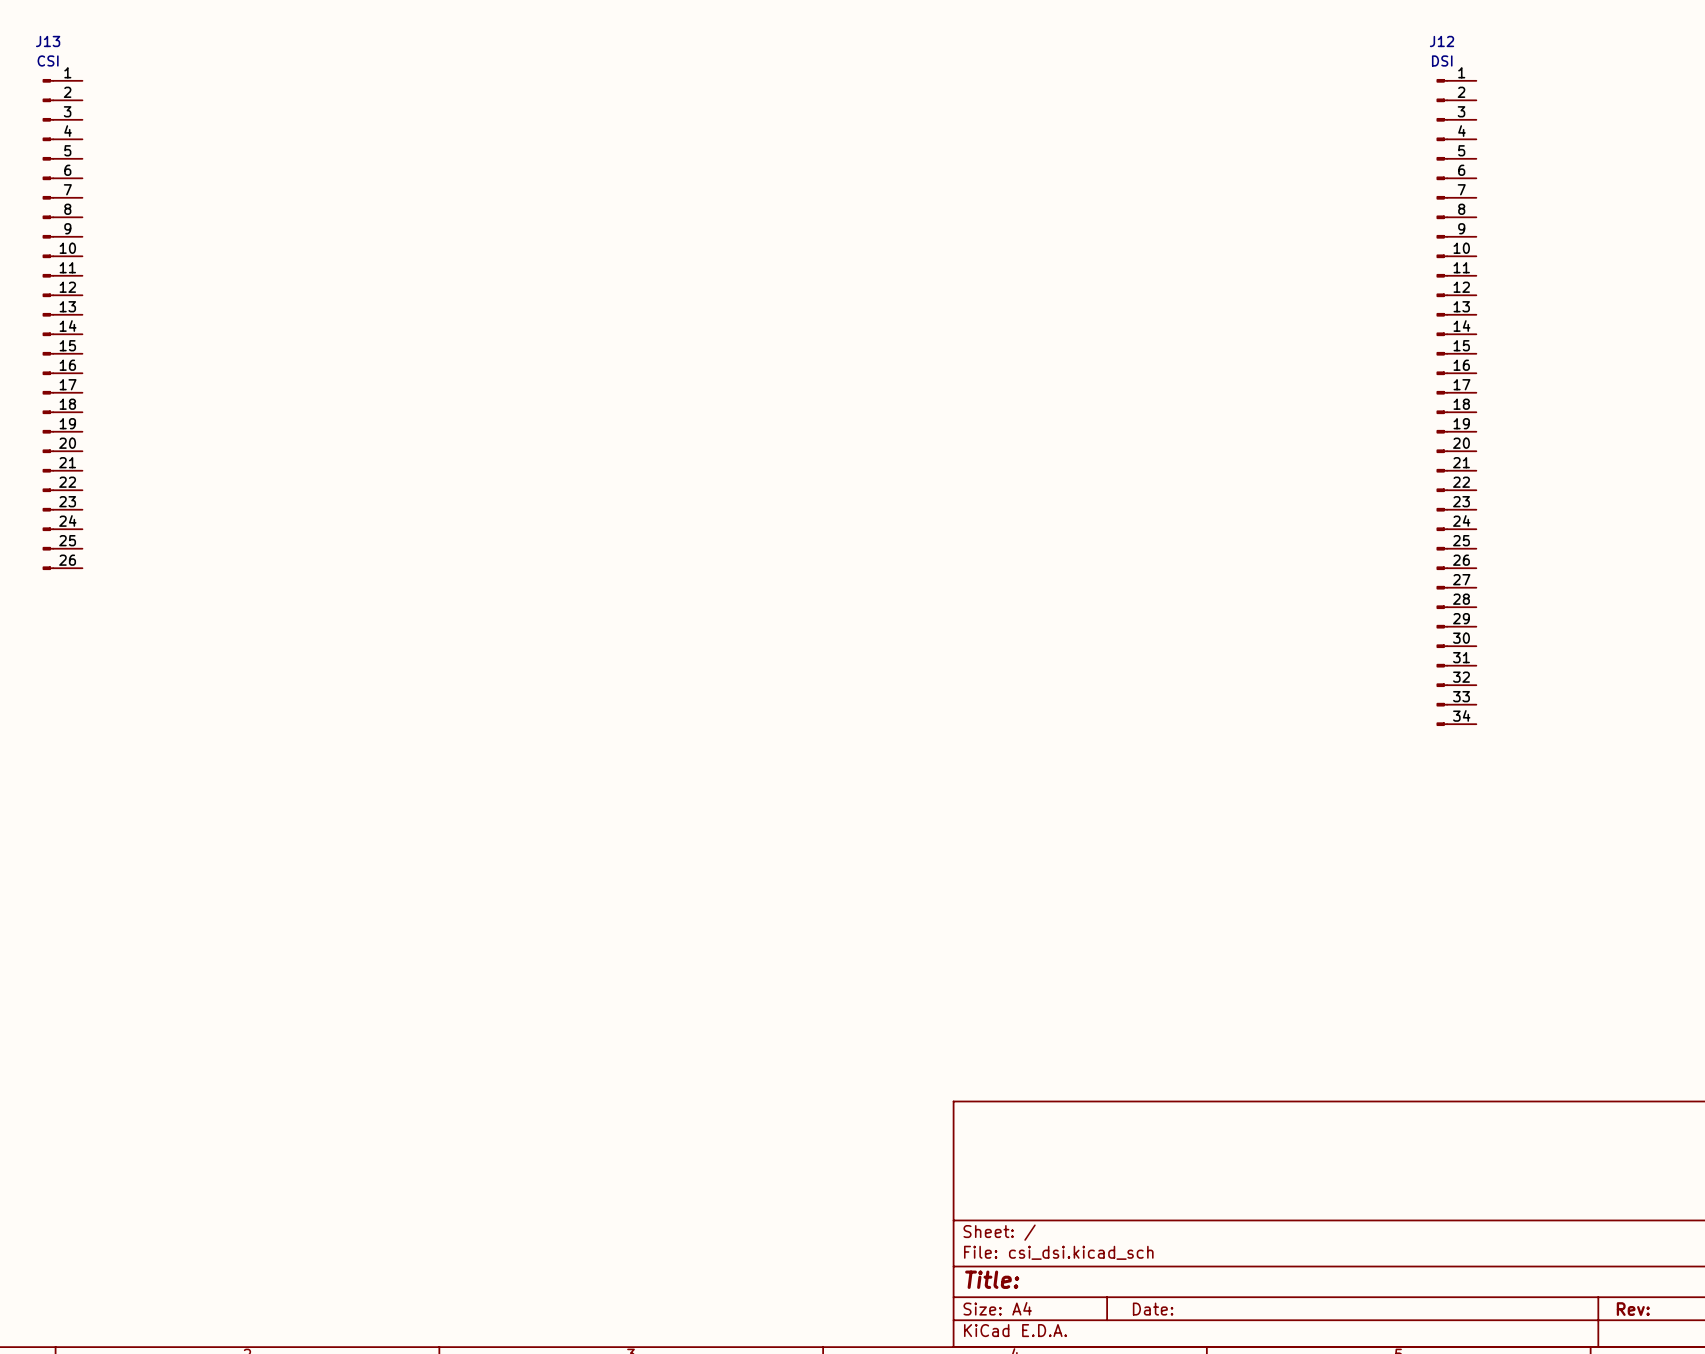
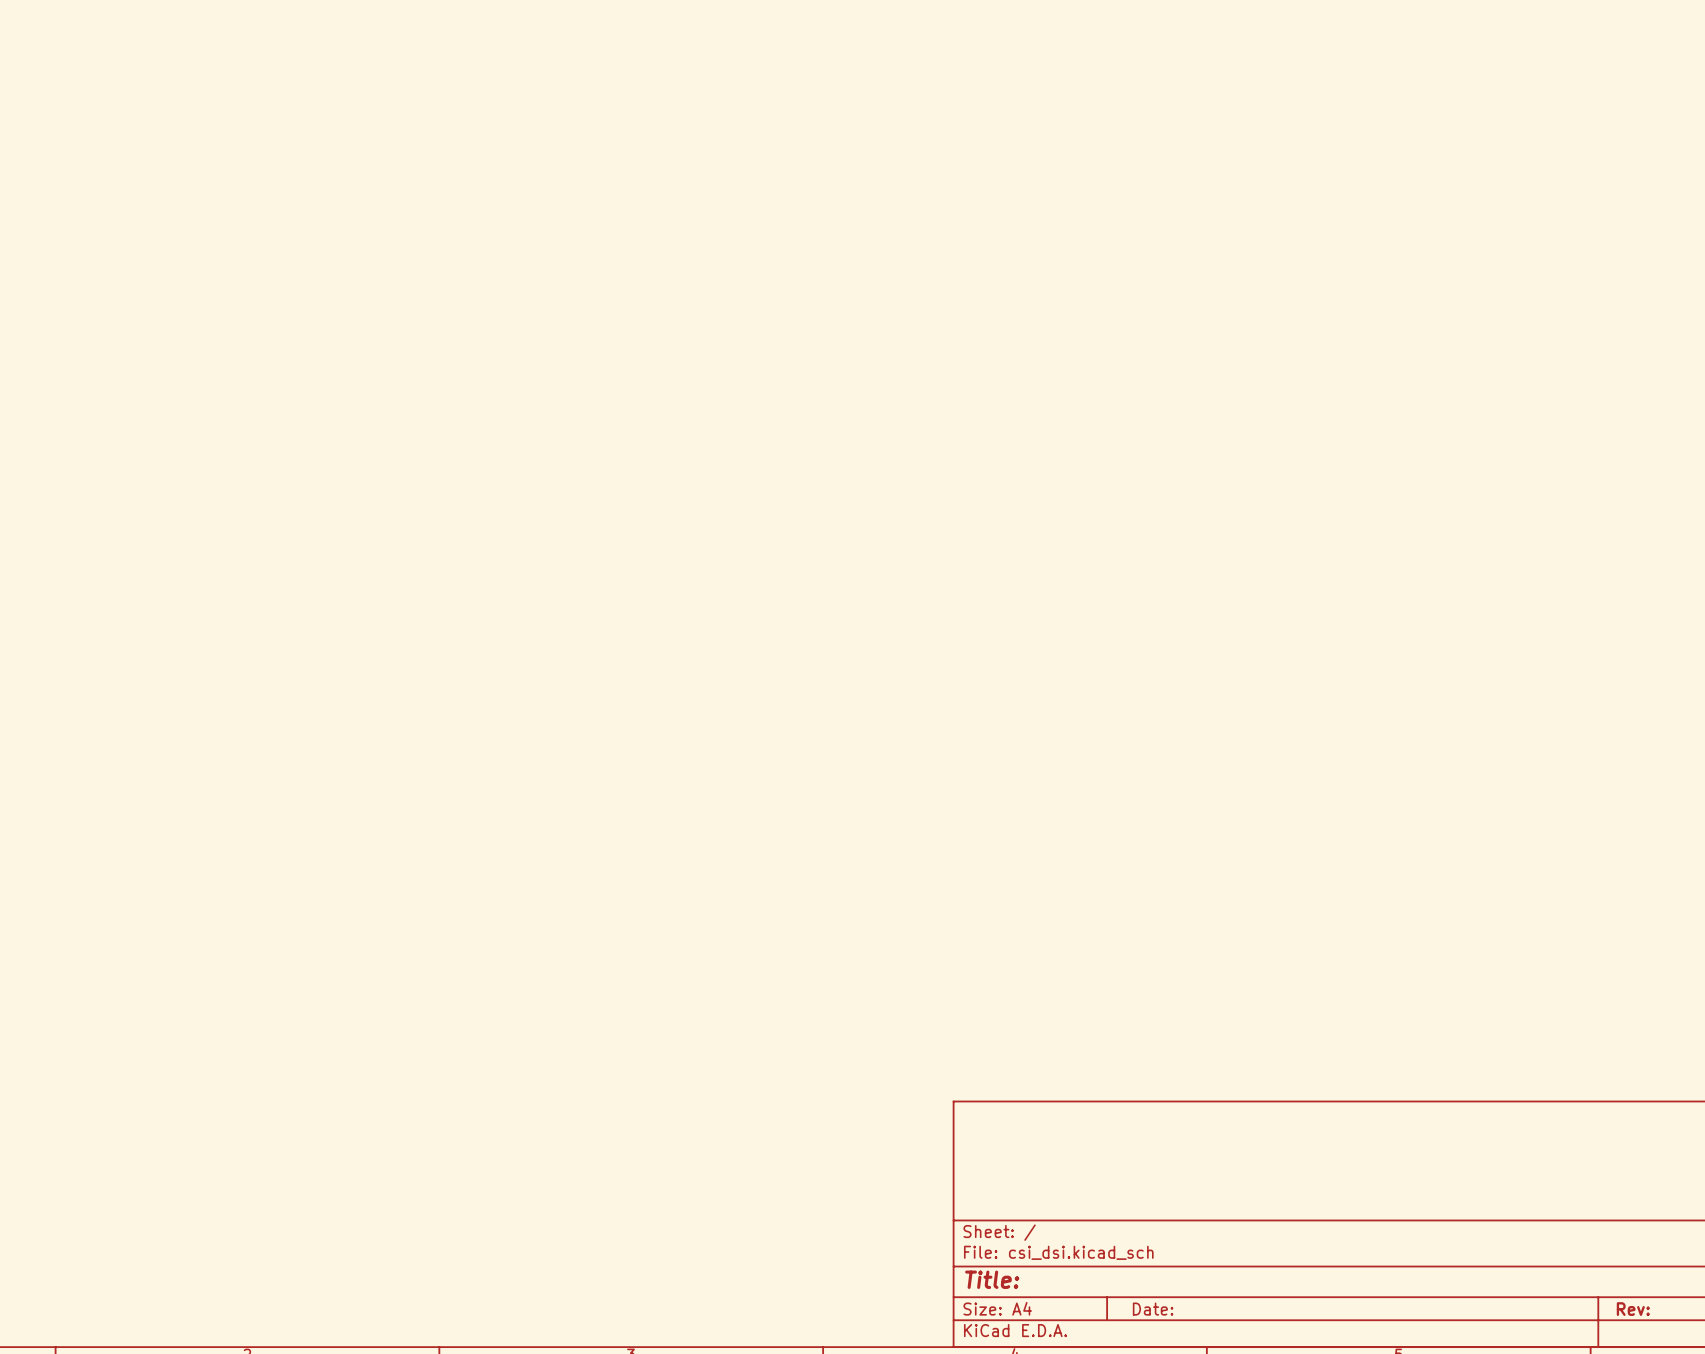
J13: CSI (62, 324) -> none
J12: DSI (1456, 402) -> none

